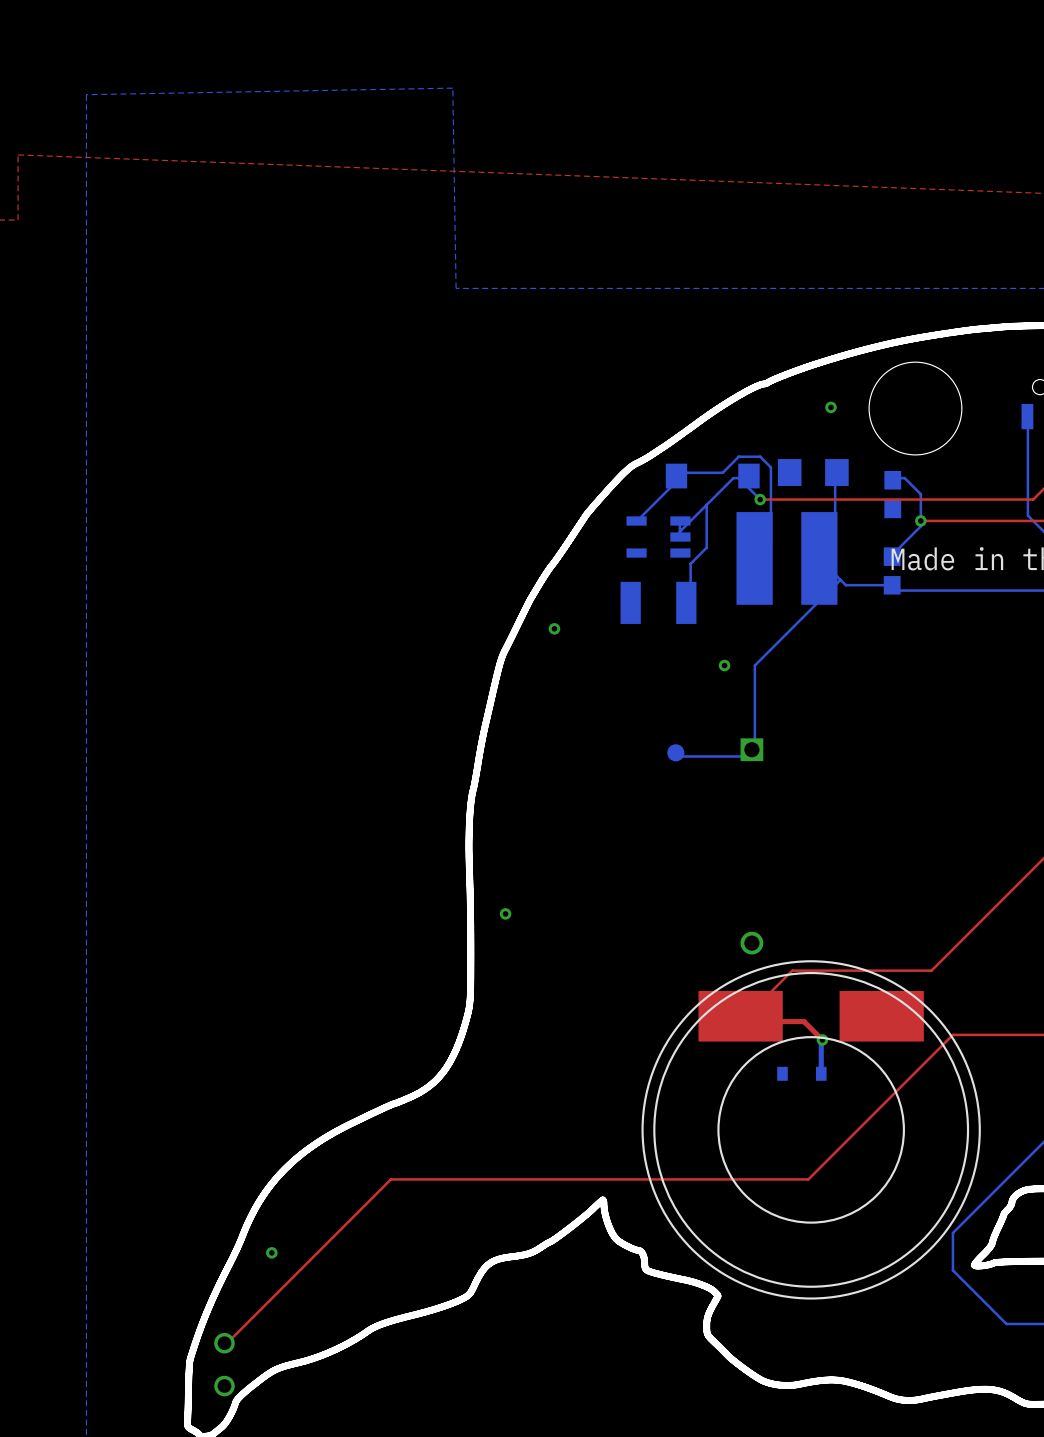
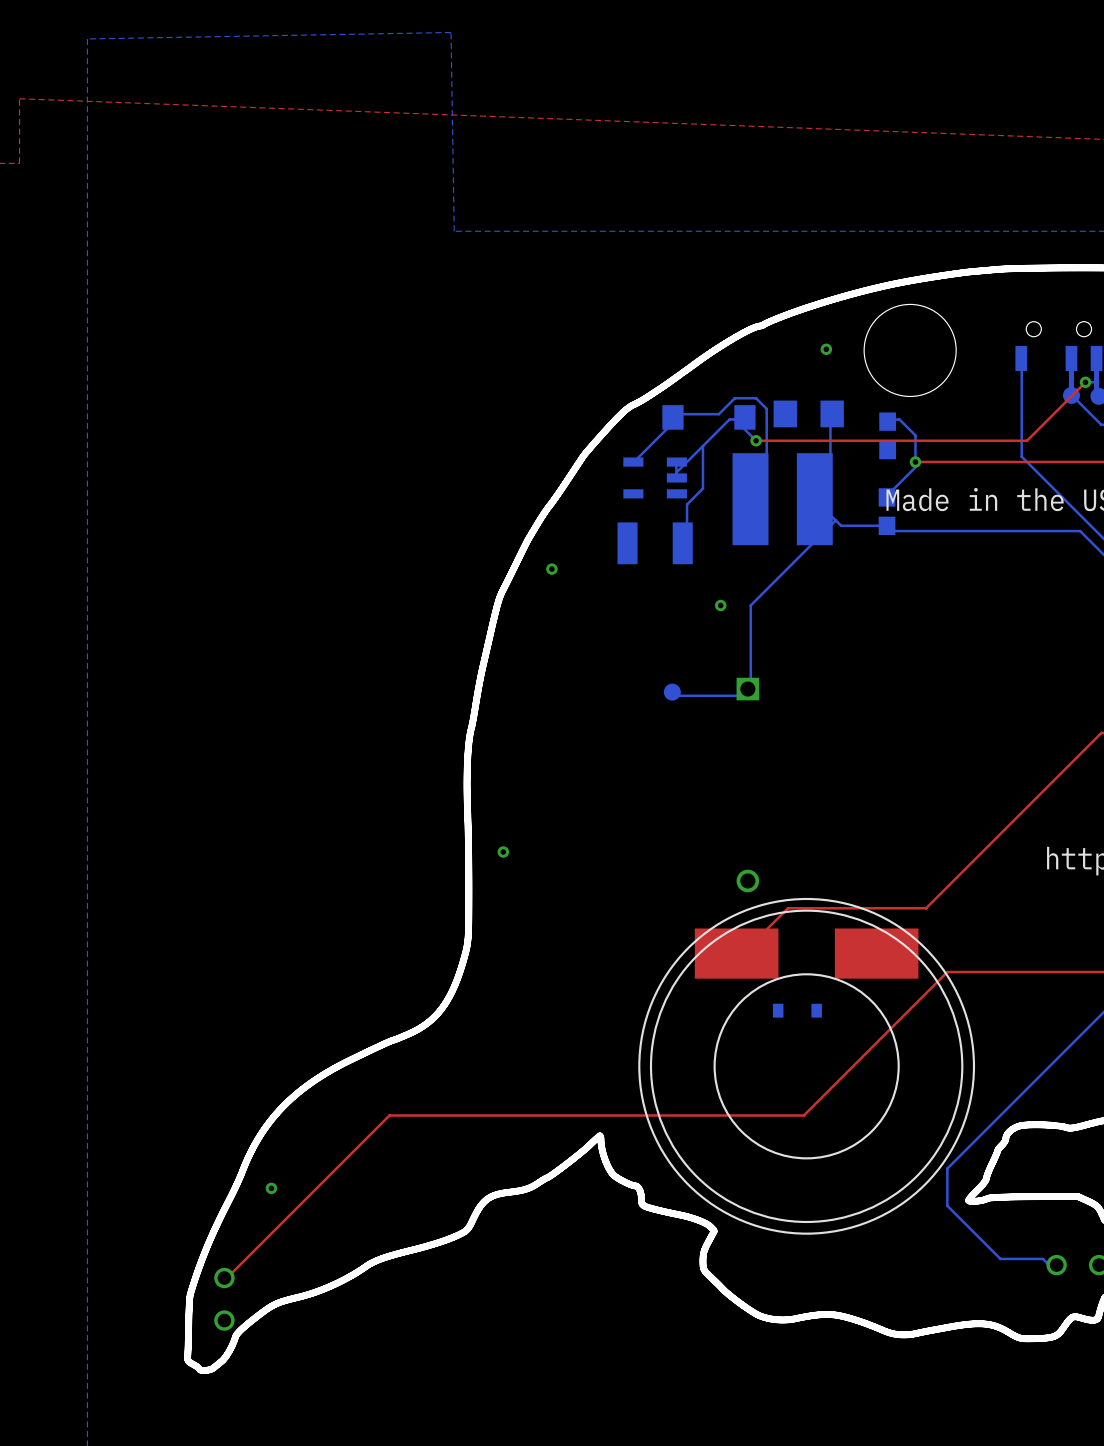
top track: (763, 1021) (804, 1021) (822, 1039) -> none
bottom track: (822, 1039) (821, 1073) -> none
via: (822, 1039) -> none

